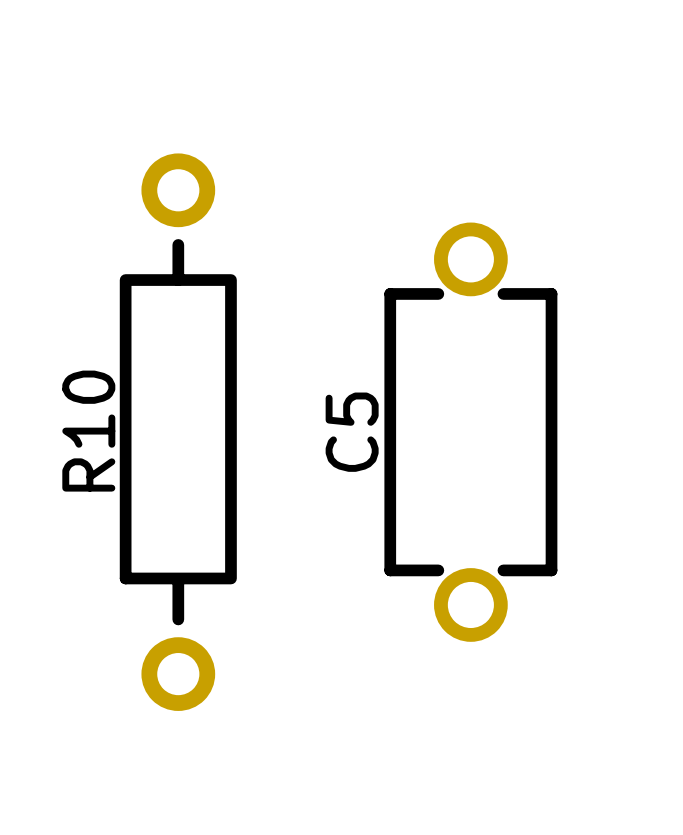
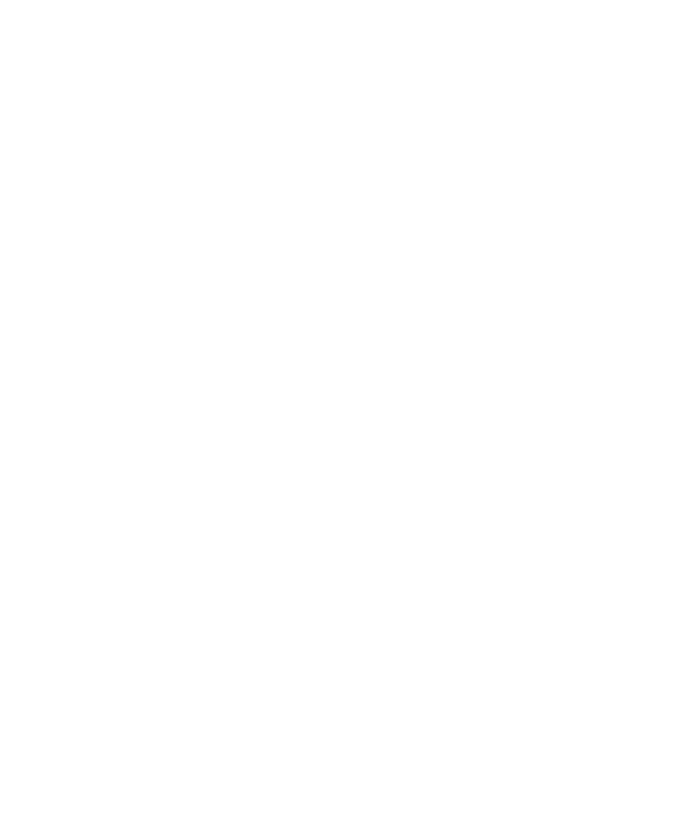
R10: (178, 432) -> none
C5: (470, 432) -> none

